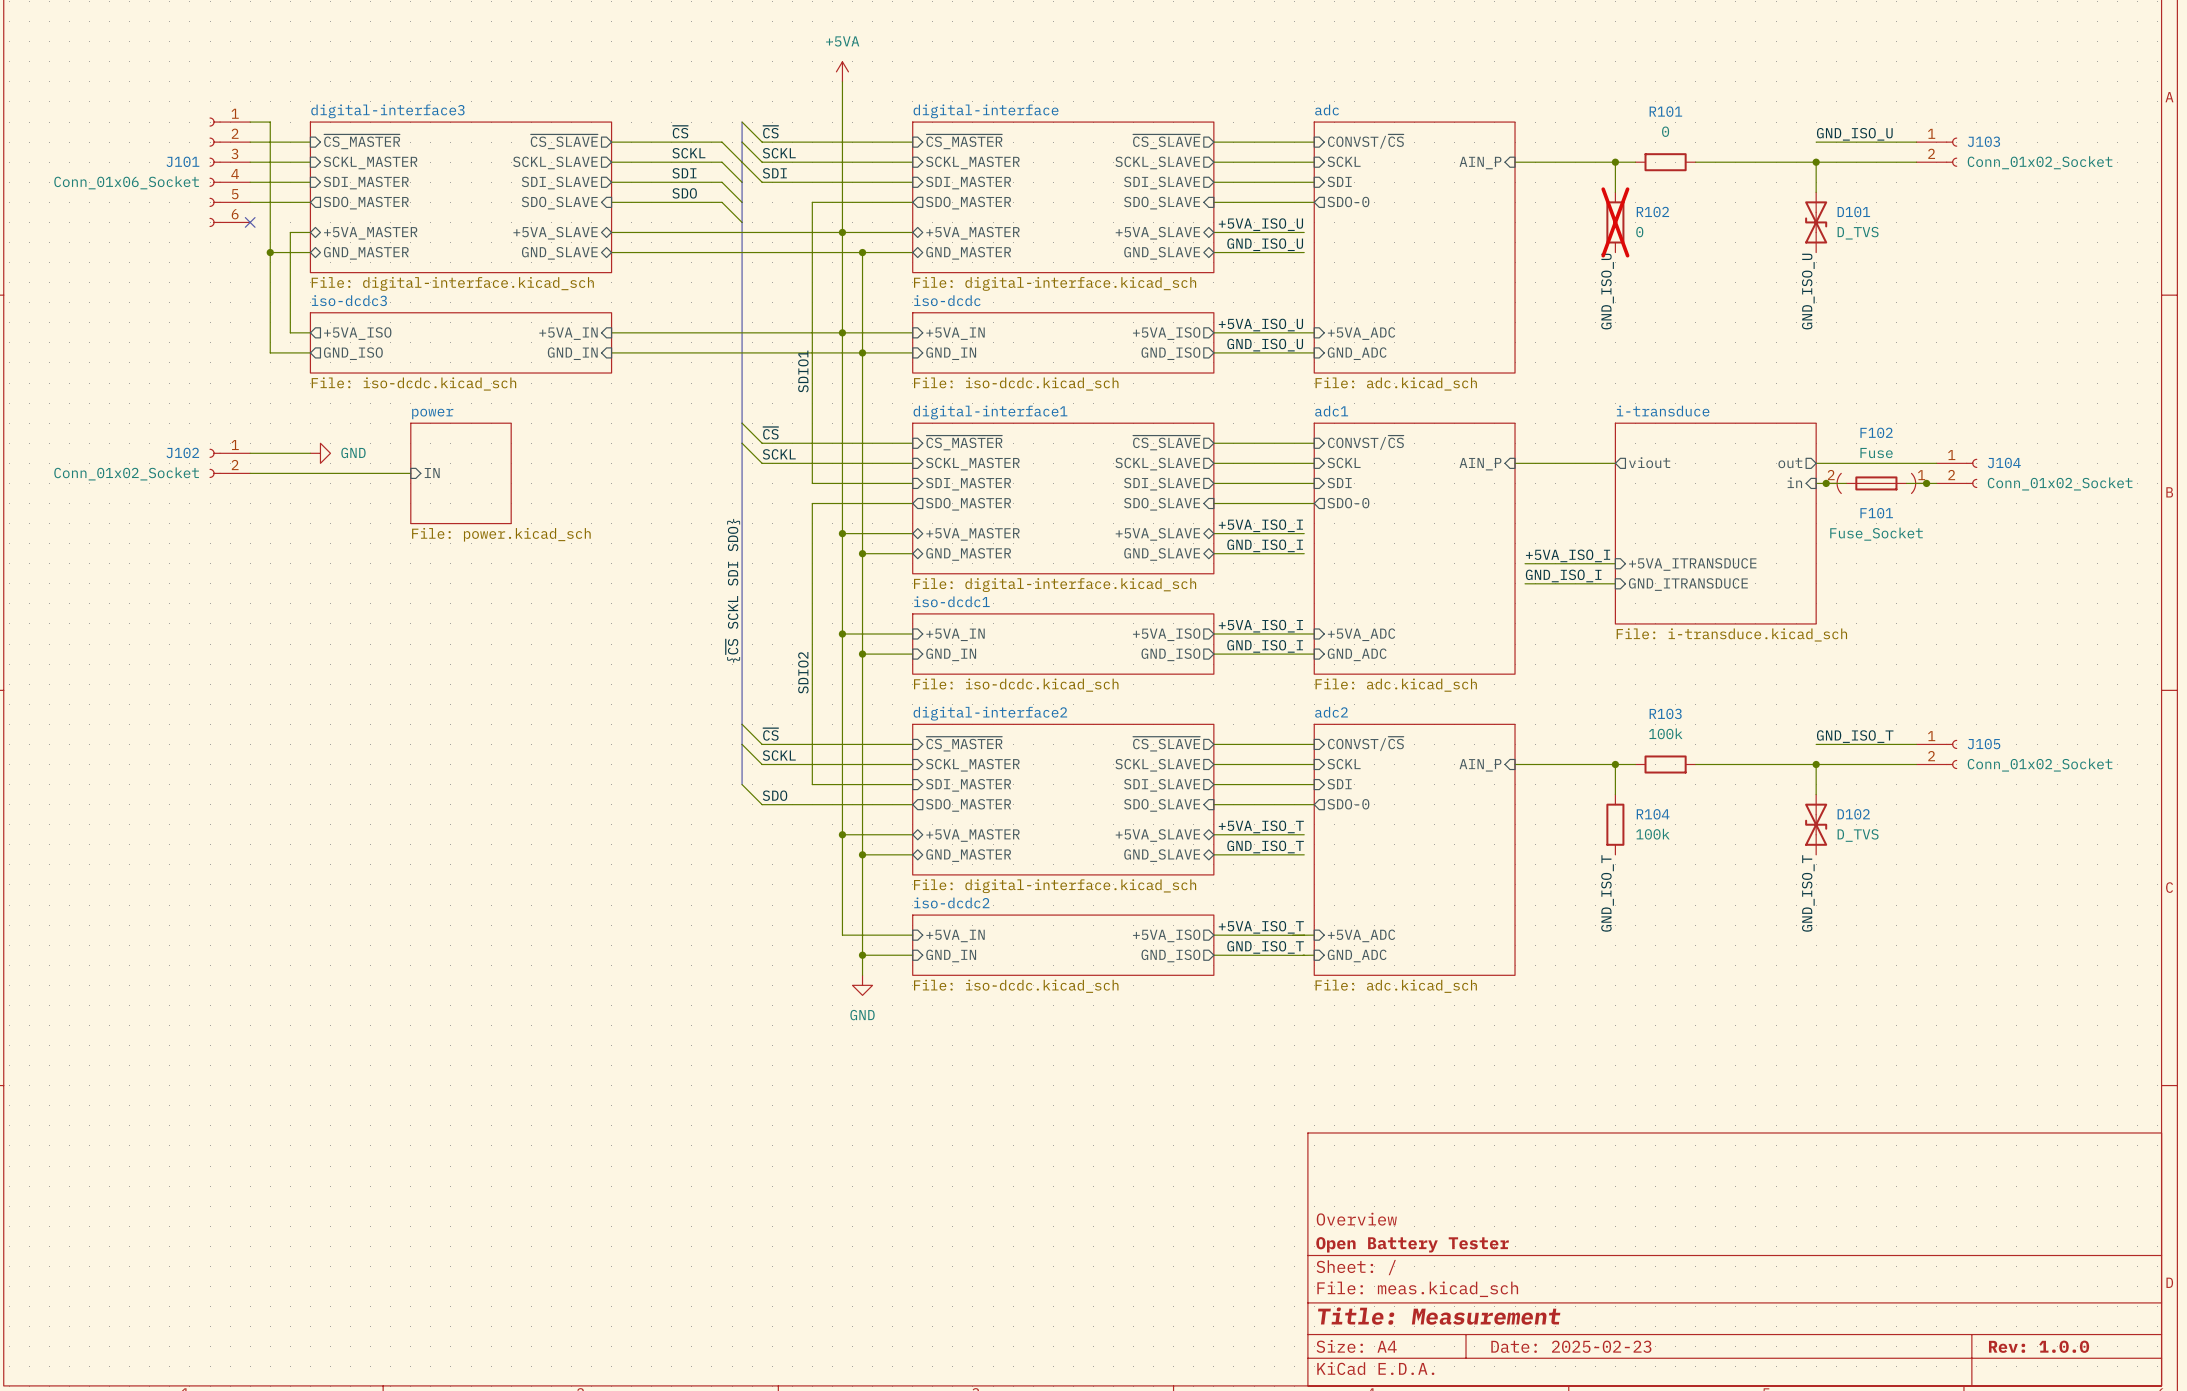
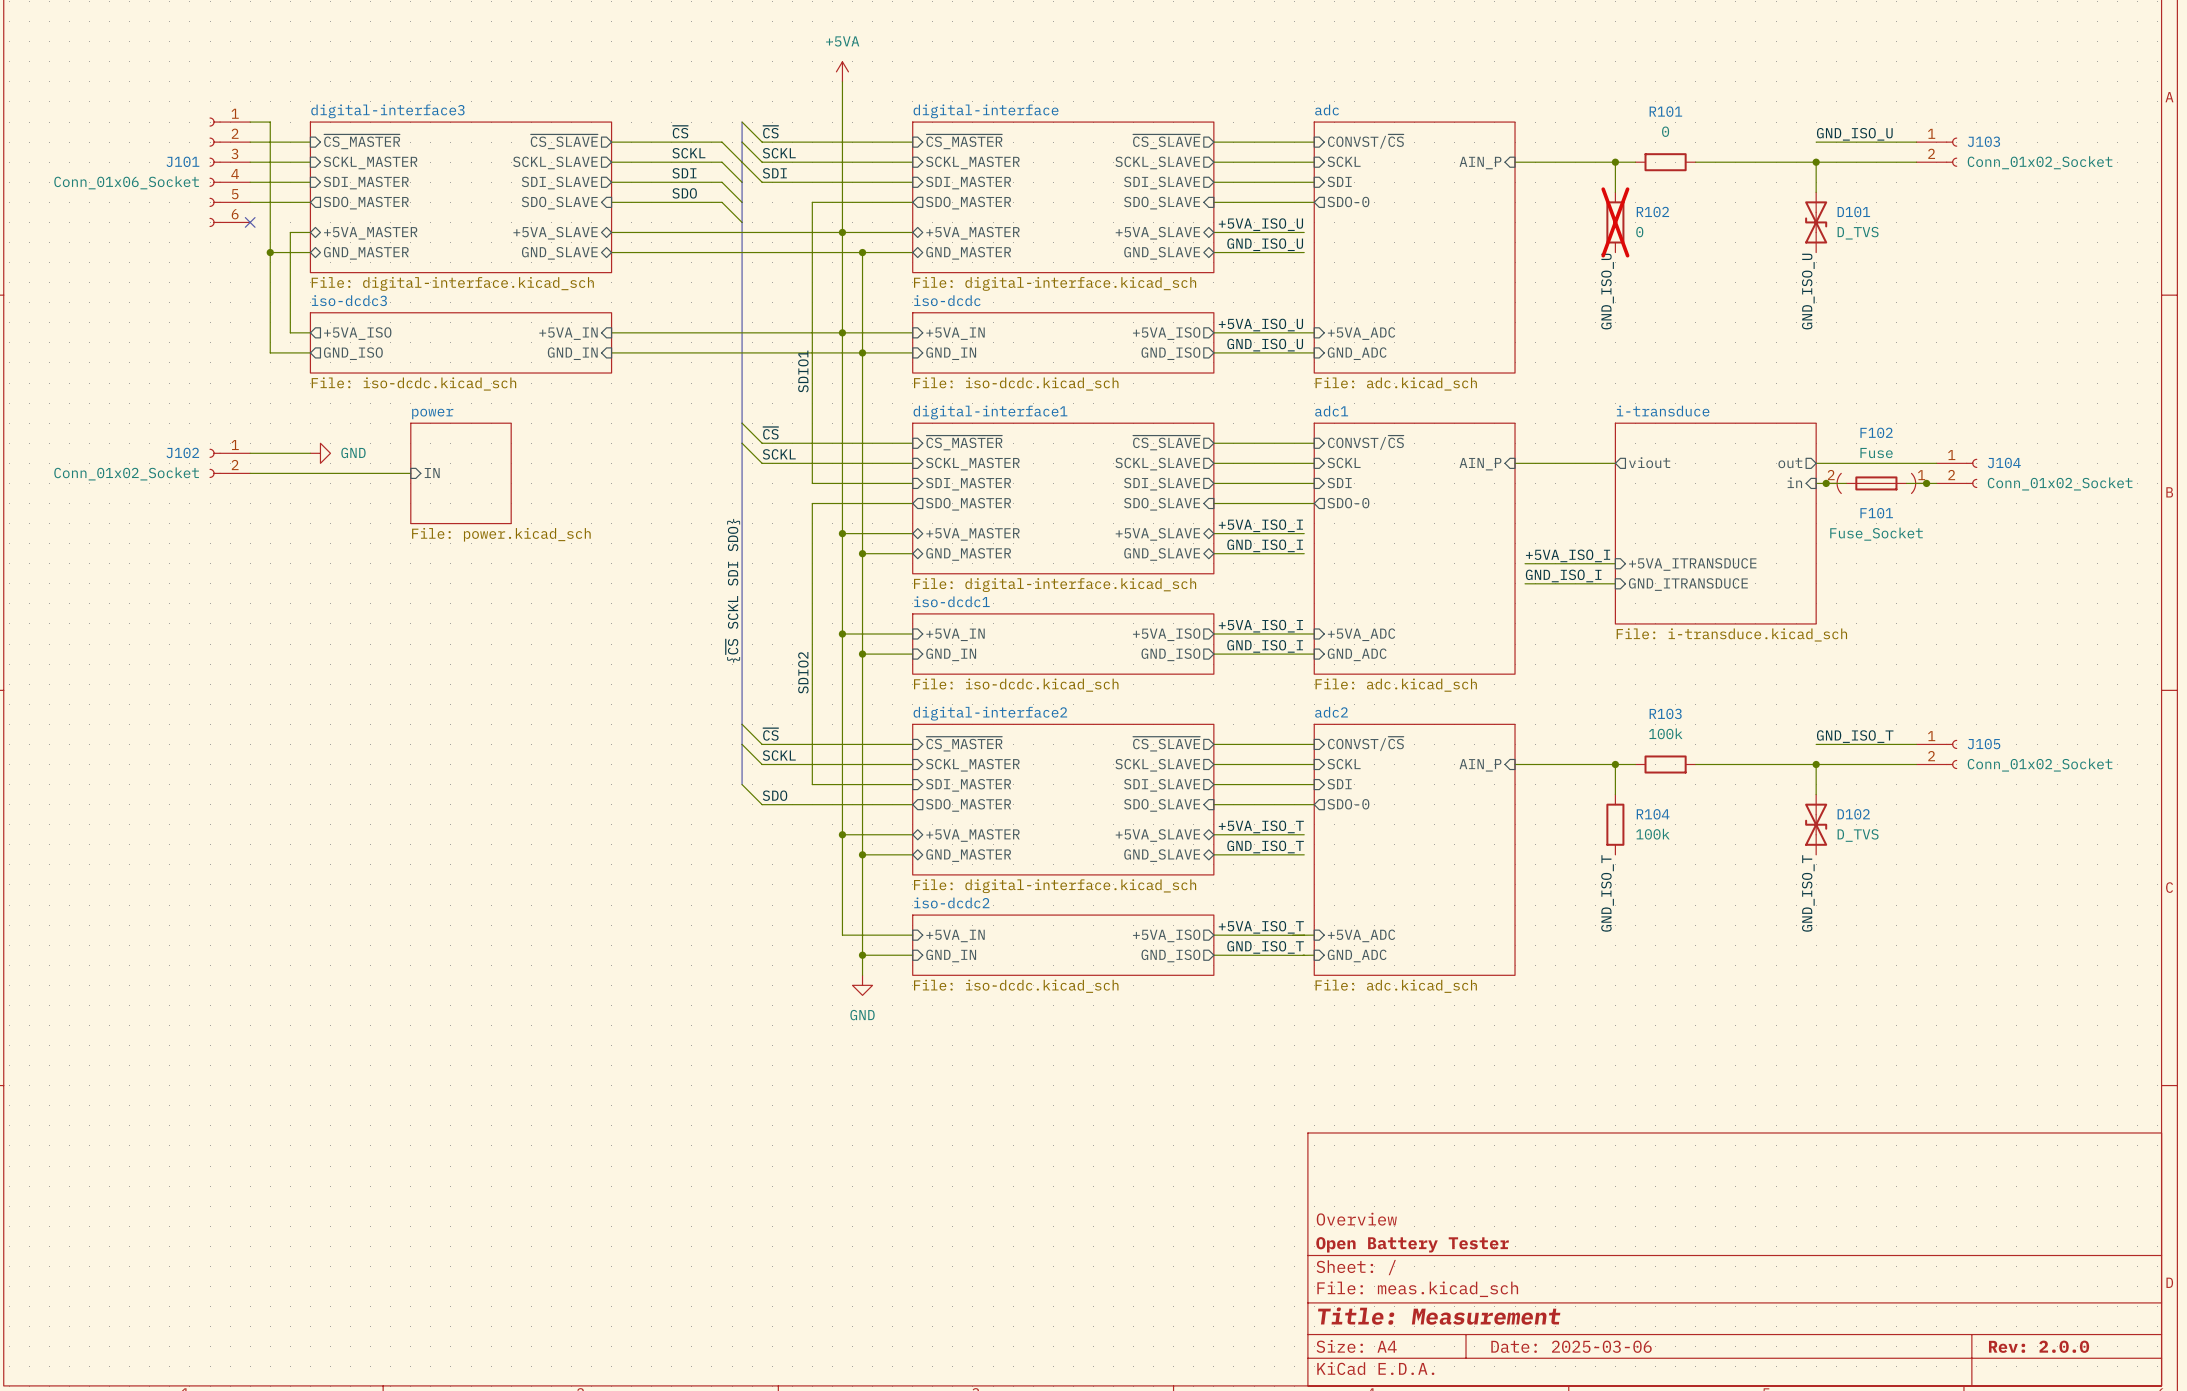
title block: Date: 2025-02-23 (1571, 1346) -> Date: 2025-03-06 (1571, 1346)
title block: Rev: 1.0.0 (2039, 1346) -> Rev: 2.0.0 (2039, 1346)

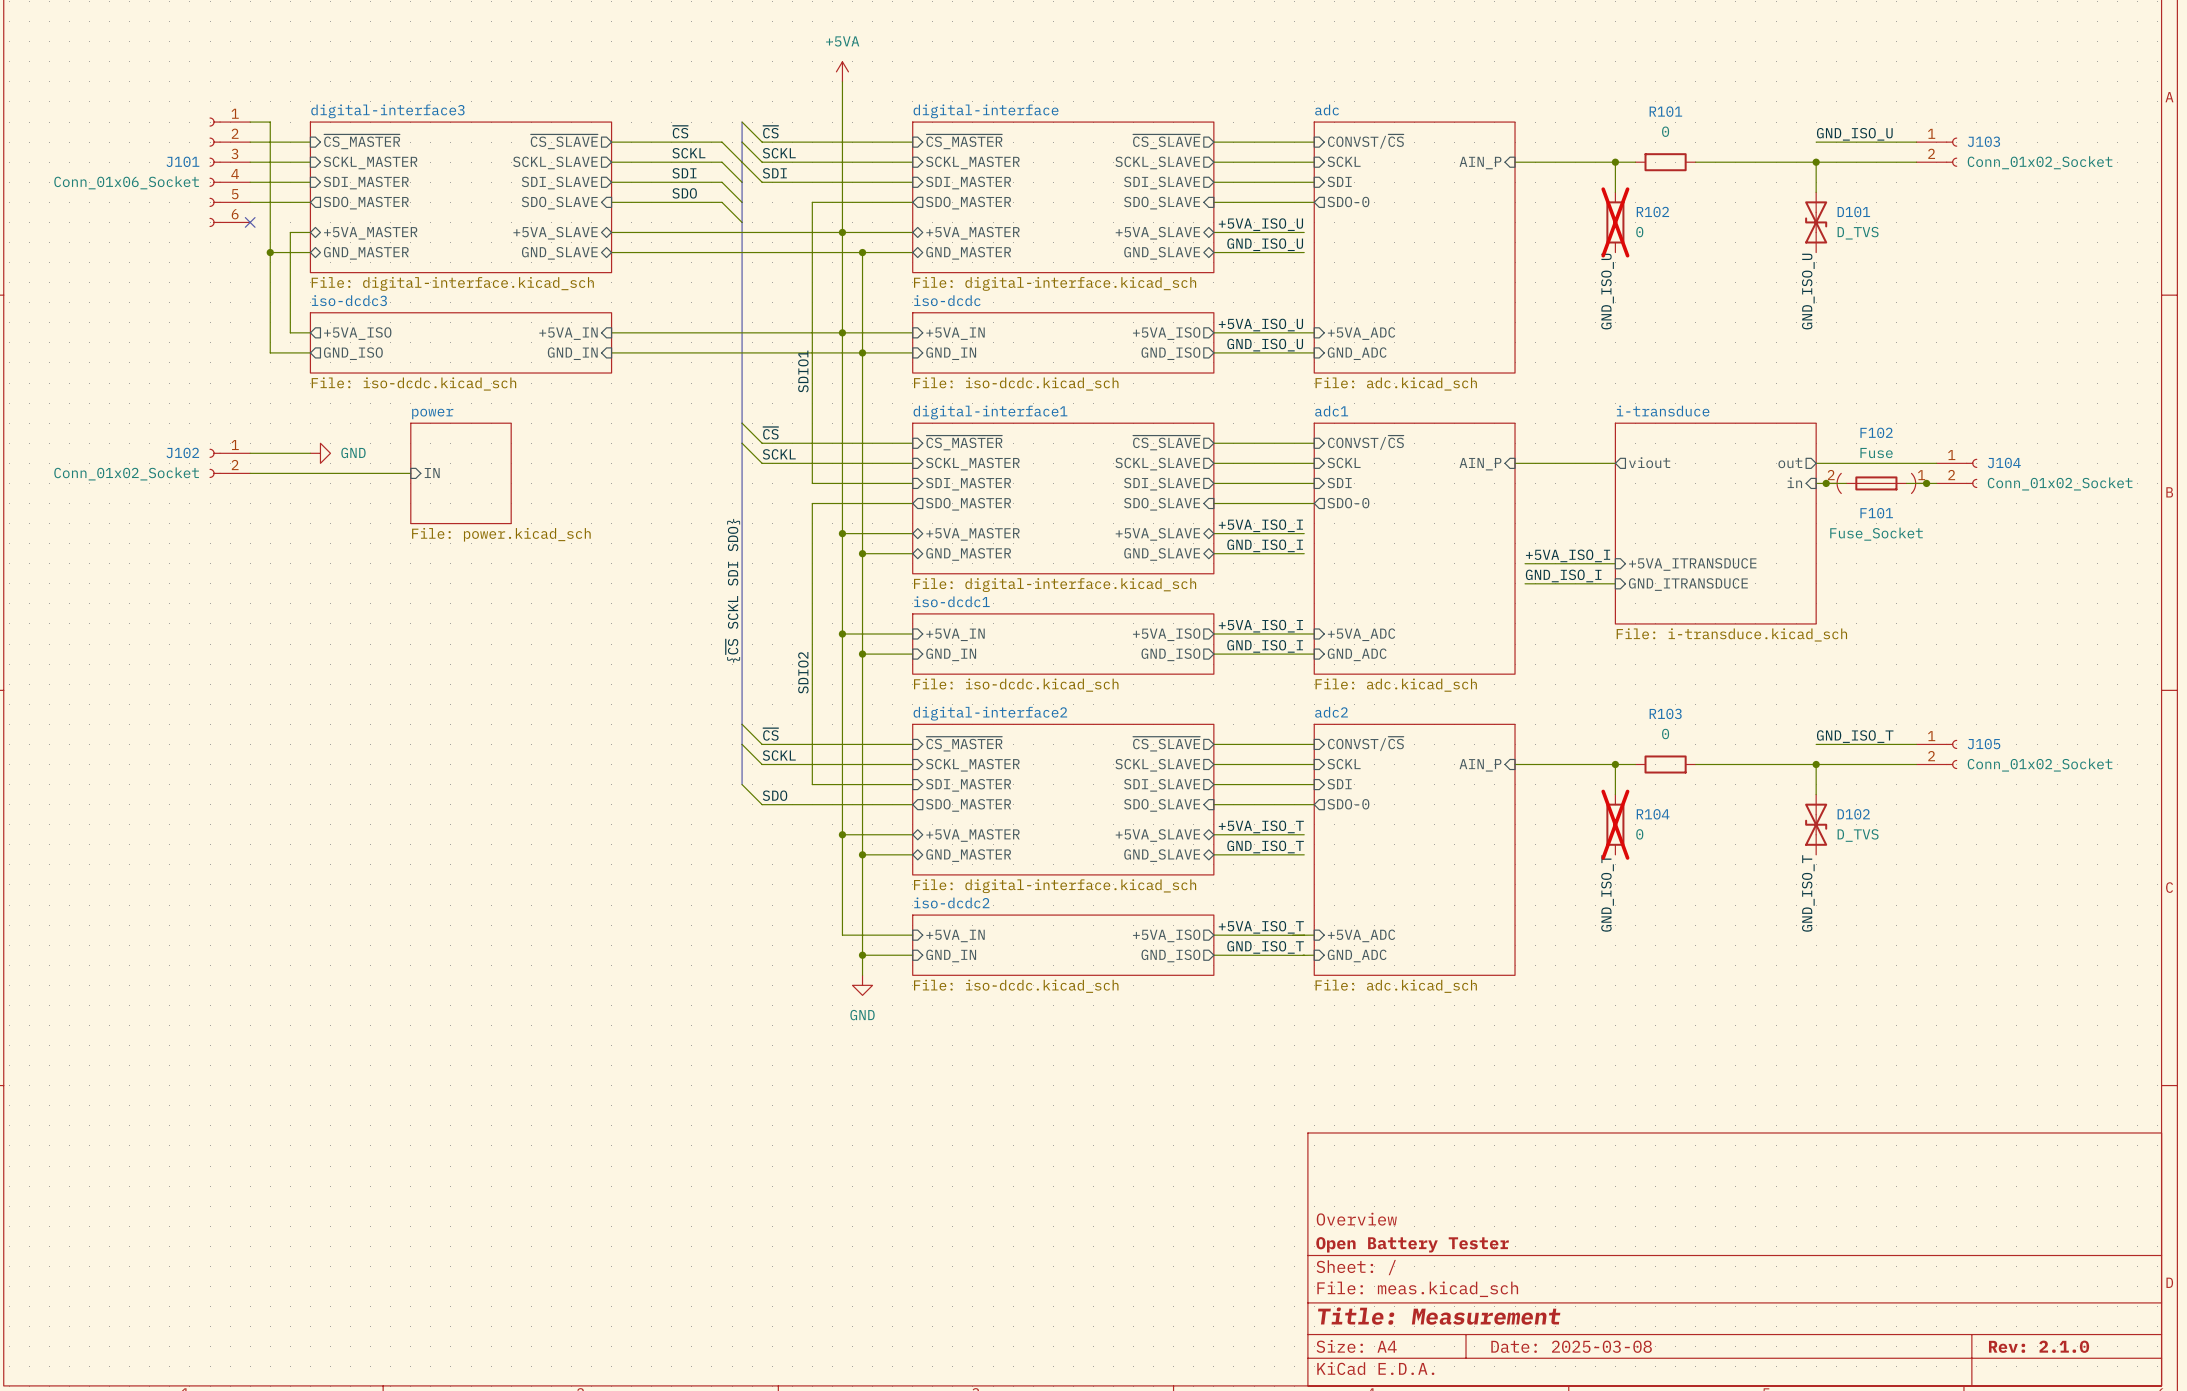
R103 value: 100k (1665, 733) -> 0 (1665, 734)
R104 do-not-place cross: none -> (1615, 824)
R104 value: 100k (1652, 834) -> 0 (1639, 834)
title block: Date: 2025-03-06 (1571, 1346) -> Date: 2025-03-08 (1571, 1346)
title block: Rev: 2.0.0 (2039, 1346) -> Rev: 2.1.0 (2039, 1346)

